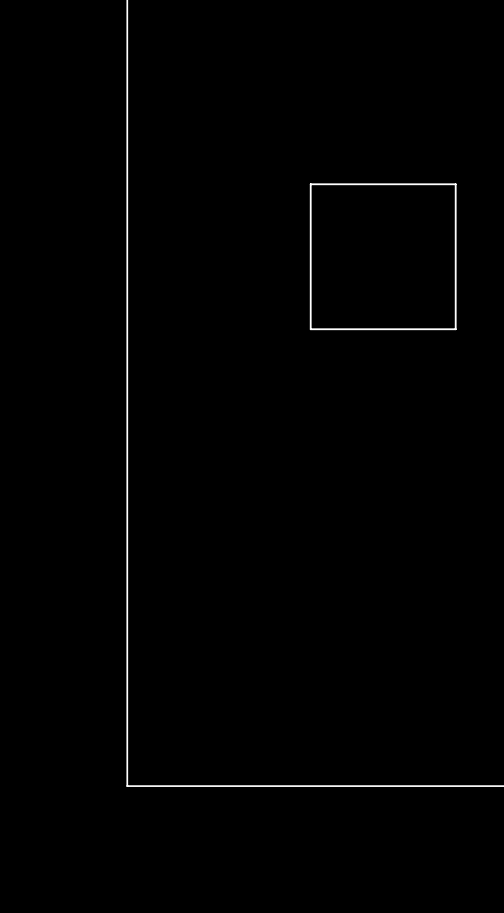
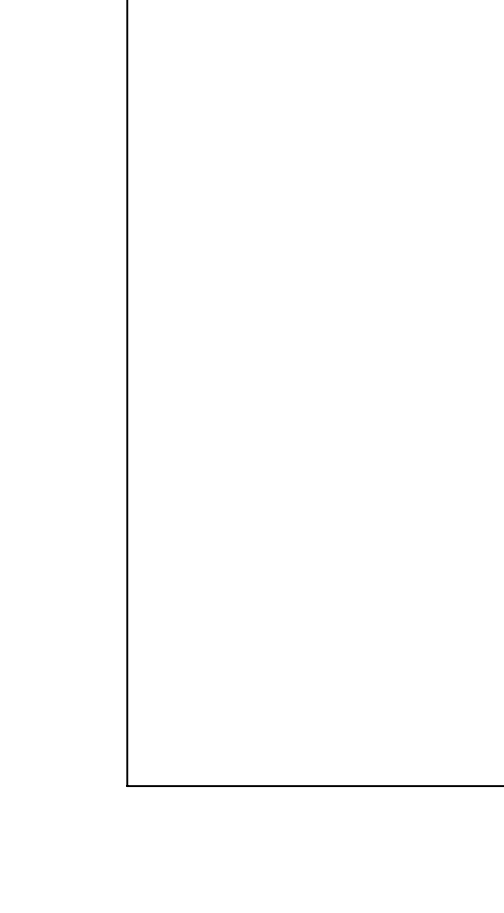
part: (383, 256) -> none

